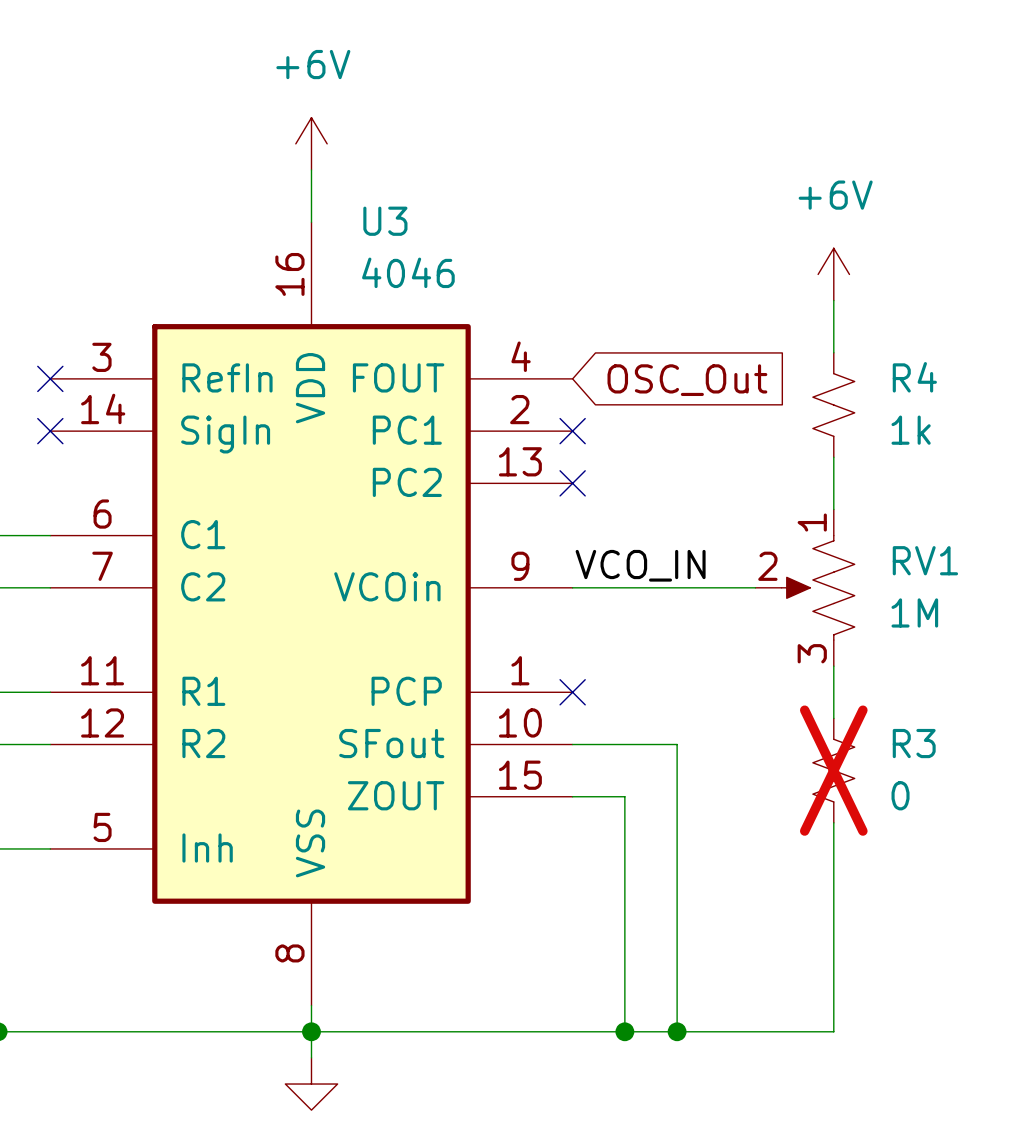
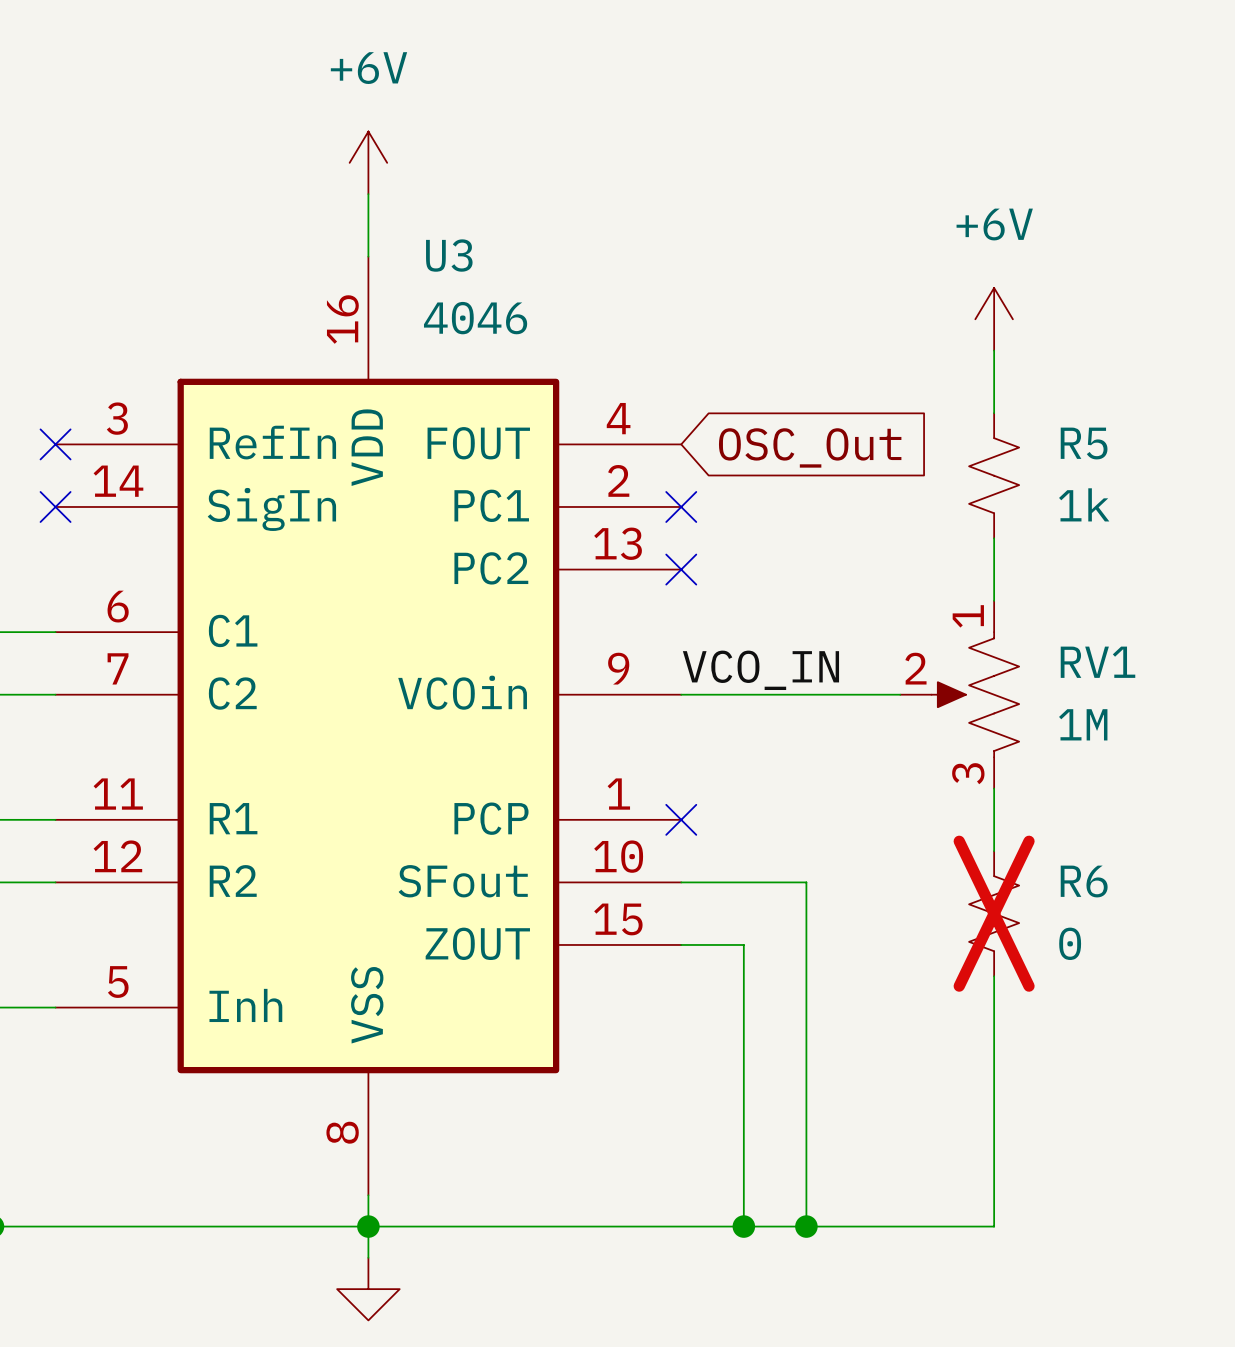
R4 name: R4 (914, 377) -> R5 (1084, 443)
R3 name: R3 (914, 743) -> R6 (1084, 881)

